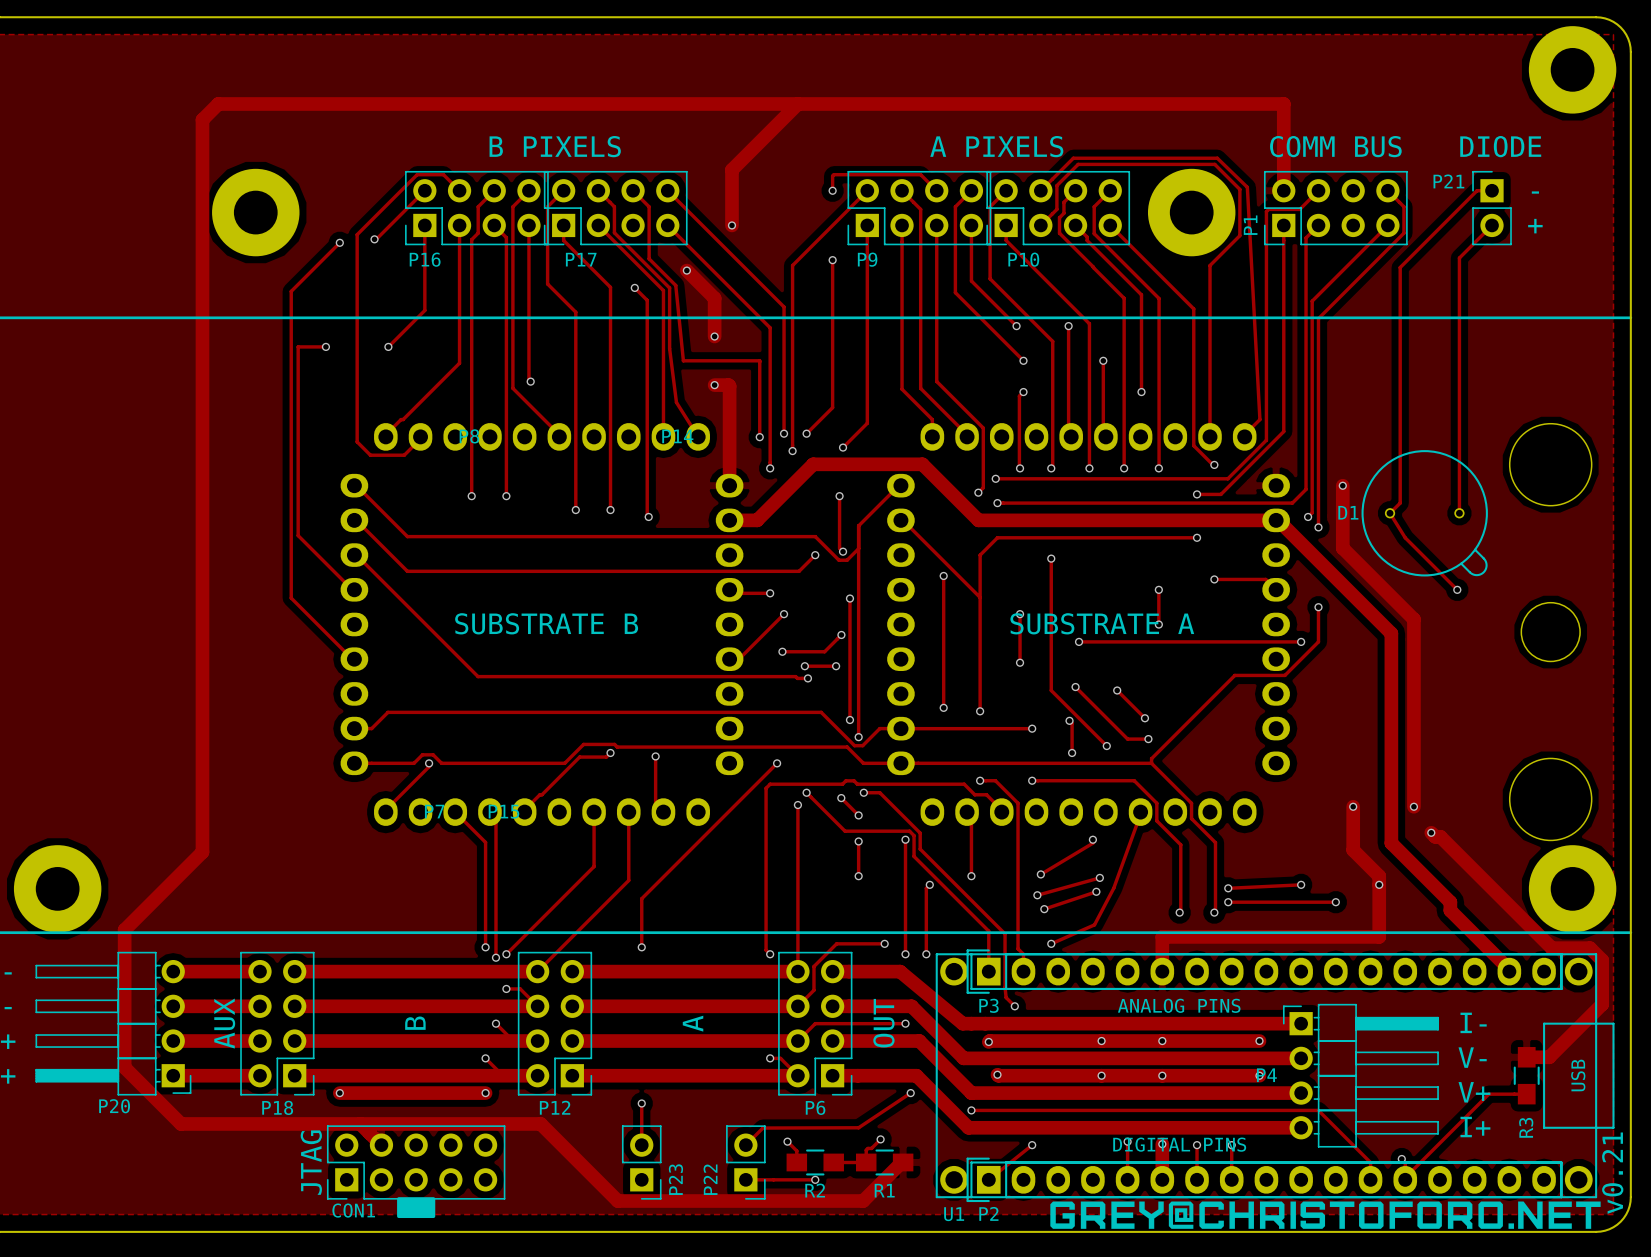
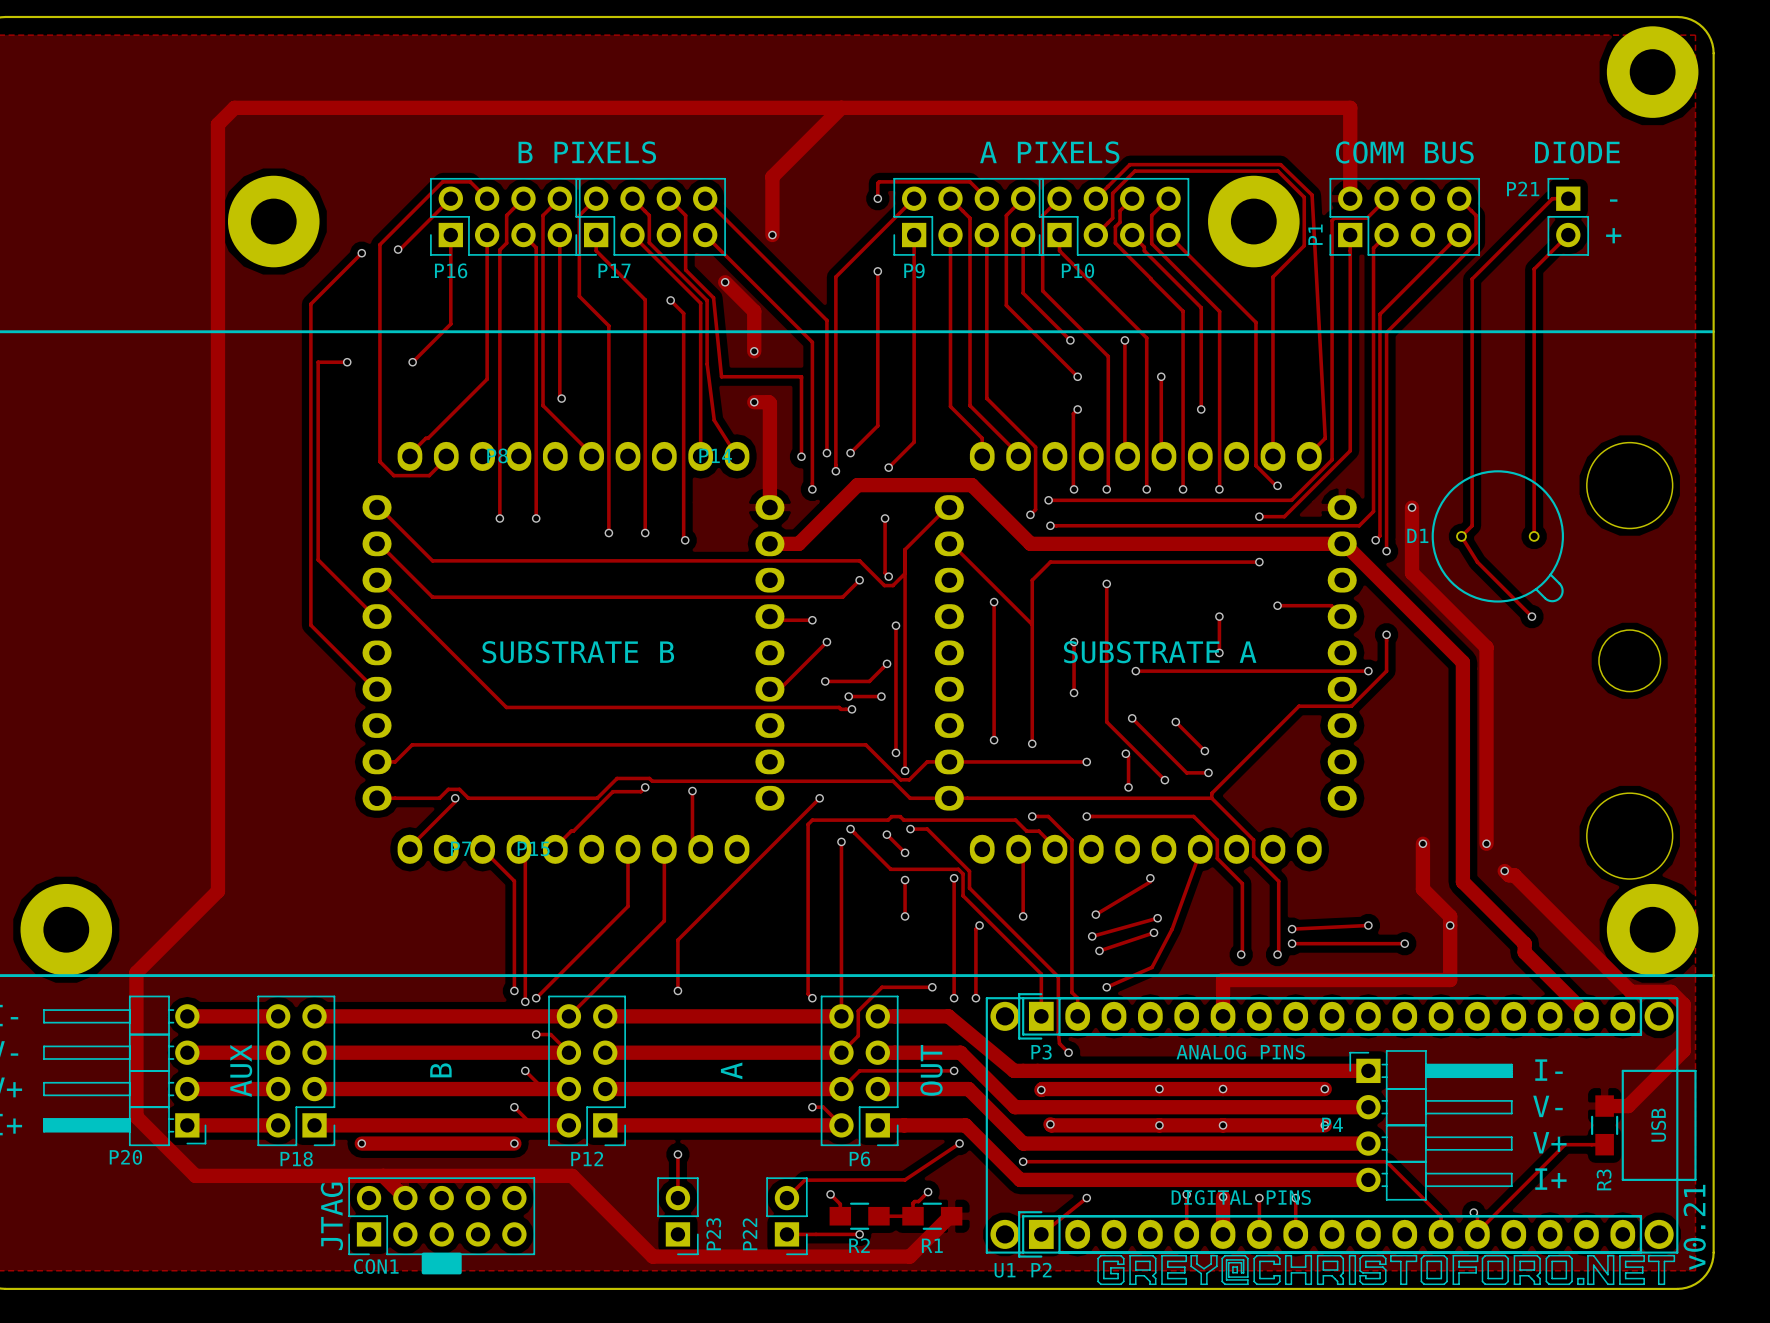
line: none -> (1100, 1255) (1120, 1255) (1123, 1258) (1123, 1264) (1118, 1264) (1118, 1261) (1103, 1261) (1103, 1278) (1118, 1278) (1118, 1273) (1110, 1273) (1110, 1267) (1123, 1267) (1123, 1281) (1120, 1284) (1100, 1284) (1098, 1281) (1098, 1258) (1100, 1255)
line: none -> (1130, 1255) (1152, 1255) (1155, 1258) (1155, 1272) (1152, 1275) (1155, 1278) (1155, 1284) (1150, 1284) (1150, 1281) (1144, 1275) (1135, 1275) (1135, 1284) (1130, 1284) (1130, 1255)
line: none -> (1162, 1255) (1186, 1255) (1186, 1261) (1167, 1261) (1167, 1267) (1184, 1267) (1184, 1272) (1167, 1272) (1167, 1278) (1186, 1278) (1186, 1284) (1162, 1284) (1162, 1255)
line: none -> (1191, 1255) (1196, 1255) (1196, 1263) (1203, 1268) (1211, 1263) (1211, 1255) (1216, 1255) (1216, 1266) (1206, 1273) (1206, 1284) (1201, 1284) (1201, 1273) (1191, 1266) (1191, 1255)
line: none -> (1225, 1255) (1245, 1255) (1247, 1258) (1247, 1277) (1228, 1277) (1228, 1262) (1241, 1262) (1241, 1272) (1243, 1272) (1243, 1259) (1226, 1259) (1226, 1279) (1247, 1279) (1247, 1284) (1225, 1284) (1222, 1281) (1222, 1258) (1225, 1255)
line: none -> (1256, 1255) (1254, 1258) (1254, 1281) (1256, 1284) (1277, 1284) (1279, 1281) (1279, 1275) (1274, 1275) (1274, 1278) (1259, 1278) (1259, 1261) (1274, 1261) (1274, 1264) (1279, 1264) (1279, 1258) (1277, 1255) (1256, 1255)
line: none -> (1285, 1255) (1291, 1255) (1291, 1267) (1305, 1267) (1305, 1255) (1311, 1255) (1311, 1284) (1305, 1284) (1305, 1272) (1291, 1272) (1291, 1284) (1285, 1284) (1285, 1255)
line: none -> (1317, 1255) (1340, 1255) (1343, 1258) (1343, 1272) (1340, 1275) (1343, 1278) (1343, 1284) (1337, 1284) (1337, 1281) (1331, 1275) (1323, 1275) (1323, 1284) (1317, 1284) (1317, 1255)
line: none -> (1349, 1255) (1355, 1255) (1355, 1284) (1349, 1284) (1349, 1255)
line: none -> (1362, 1255) (1382, 1255) (1385, 1258) (1385, 1264) (1380, 1264) (1380, 1261) (1365, 1261) (1365, 1267) (1382, 1267) (1385, 1269) (1385, 1281) (1382, 1284) (1362, 1284) (1360, 1281) (1360, 1275) (1365, 1275) (1365, 1278) (1380, 1278) (1380, 1272) (1362, 1272) (1360, 1270) (1360, 1258) (1362, 1255)
line: none -> (1390, 1255) (1416, 1255) (1416, 1261) (1406, 1261) (1406, 1284) (1400, 1284) (1400, 1261) (1390, 1261) (1390, 1255)
line: none -> (1424, 1255) (1444, 1255) (1447, 1258) (1447, 1281) (1444, 1284) (1424, 1284) (1421, 1281) (1421, 1258) (1424, 1255)
line: none -> (1453, 1255) (1477, 1255) (1477, 1261) (1459, 1261) (1459, 1267) (1476, 1267) (1476, 1272) (1459, 1272) (1459, 1284) (1453, 1284) (1453, 1255)
line: none -> (1485, 1255) (1505, 1255) (1508, 1258) (1508, 1281) (1505, 1284) (1485, 1284) (1482, 1281) (1482, 1258) (1485, 1255)
line: none -> (1514, 1255) (1537, 1255) (1540, 1258) (1540, 1272) (1537, 1275) (1540, 1278) (1540, 1284) (1534, 1284) (1534, 1281) (1528, 1275) (1520, 1275) (1520, 1284) (1514, 1284) (1514, 1255)
line: none -> (1549, 1255) (1569, 1255) (1572, 1258) (1572, 1281) (1569, 1284) (1549, 1284) (1546, 1281) (1546, 1258) (1549, 1255)
line: none -> (1587, 1255) (1593, 1255) (1607, 1274) (1607, 1255) (1613, 1255) (1613, 1284) (1607, 1284) (1593, 1265) (1593, 1284) (1587, 1284) (1587, 1255)
line: none -> (1619, 1255) (1644, 1255) (1644, 1261) (1625, 1261) (1625, 1267) (1642, 1267) (1642, 1272) (1625, 1272) (1625, 1278) (1644, 1278) (1644, 1284) (1619, 1284) (1619, 1255)
line: none -> (1648, 1255) (1674, 1255) (1674, 1261) (1664, 1261) (1664, 1284) (1658, 1284) (1658, 1261) (1648, 1261) (1648, 1255)
drawing: [1050, 1201, 1601, 1229] -> none
line: none -> (1135, 1261) (1150, 1261) (1150, 1270) (1135, 1270) (1135, 1261)
line: none -> (1323, 1261) (1337, 1261) (1337, 1270) (1323, 1270) (1323, 1261)
line: none -> (1427, 1261) (1441, 1261) (1441, 1278) (1427, 1278) (1427, 1261)
line: none -> (1488, 1261) (1502, 1261) (1502, 1278) (1488, 1278) (1488, 1261)
line: none -> (1520, 1261) (1534, 1261) (1534, 1270) (1520, 1270) (1520, 1261)
line: none -> (1552, 1261) (1566, 1261) (1566, 1278) (1552, 1278) (1552, 1261)
line: none -> (1232, 1267) (1237, 1267) (1237, 1272) (1232, 1272) (1232, 1267)
line: none -> (1577, 1278) (1583, 1278) (1583, 1284) (1577, 1284) (1577, 1278)

